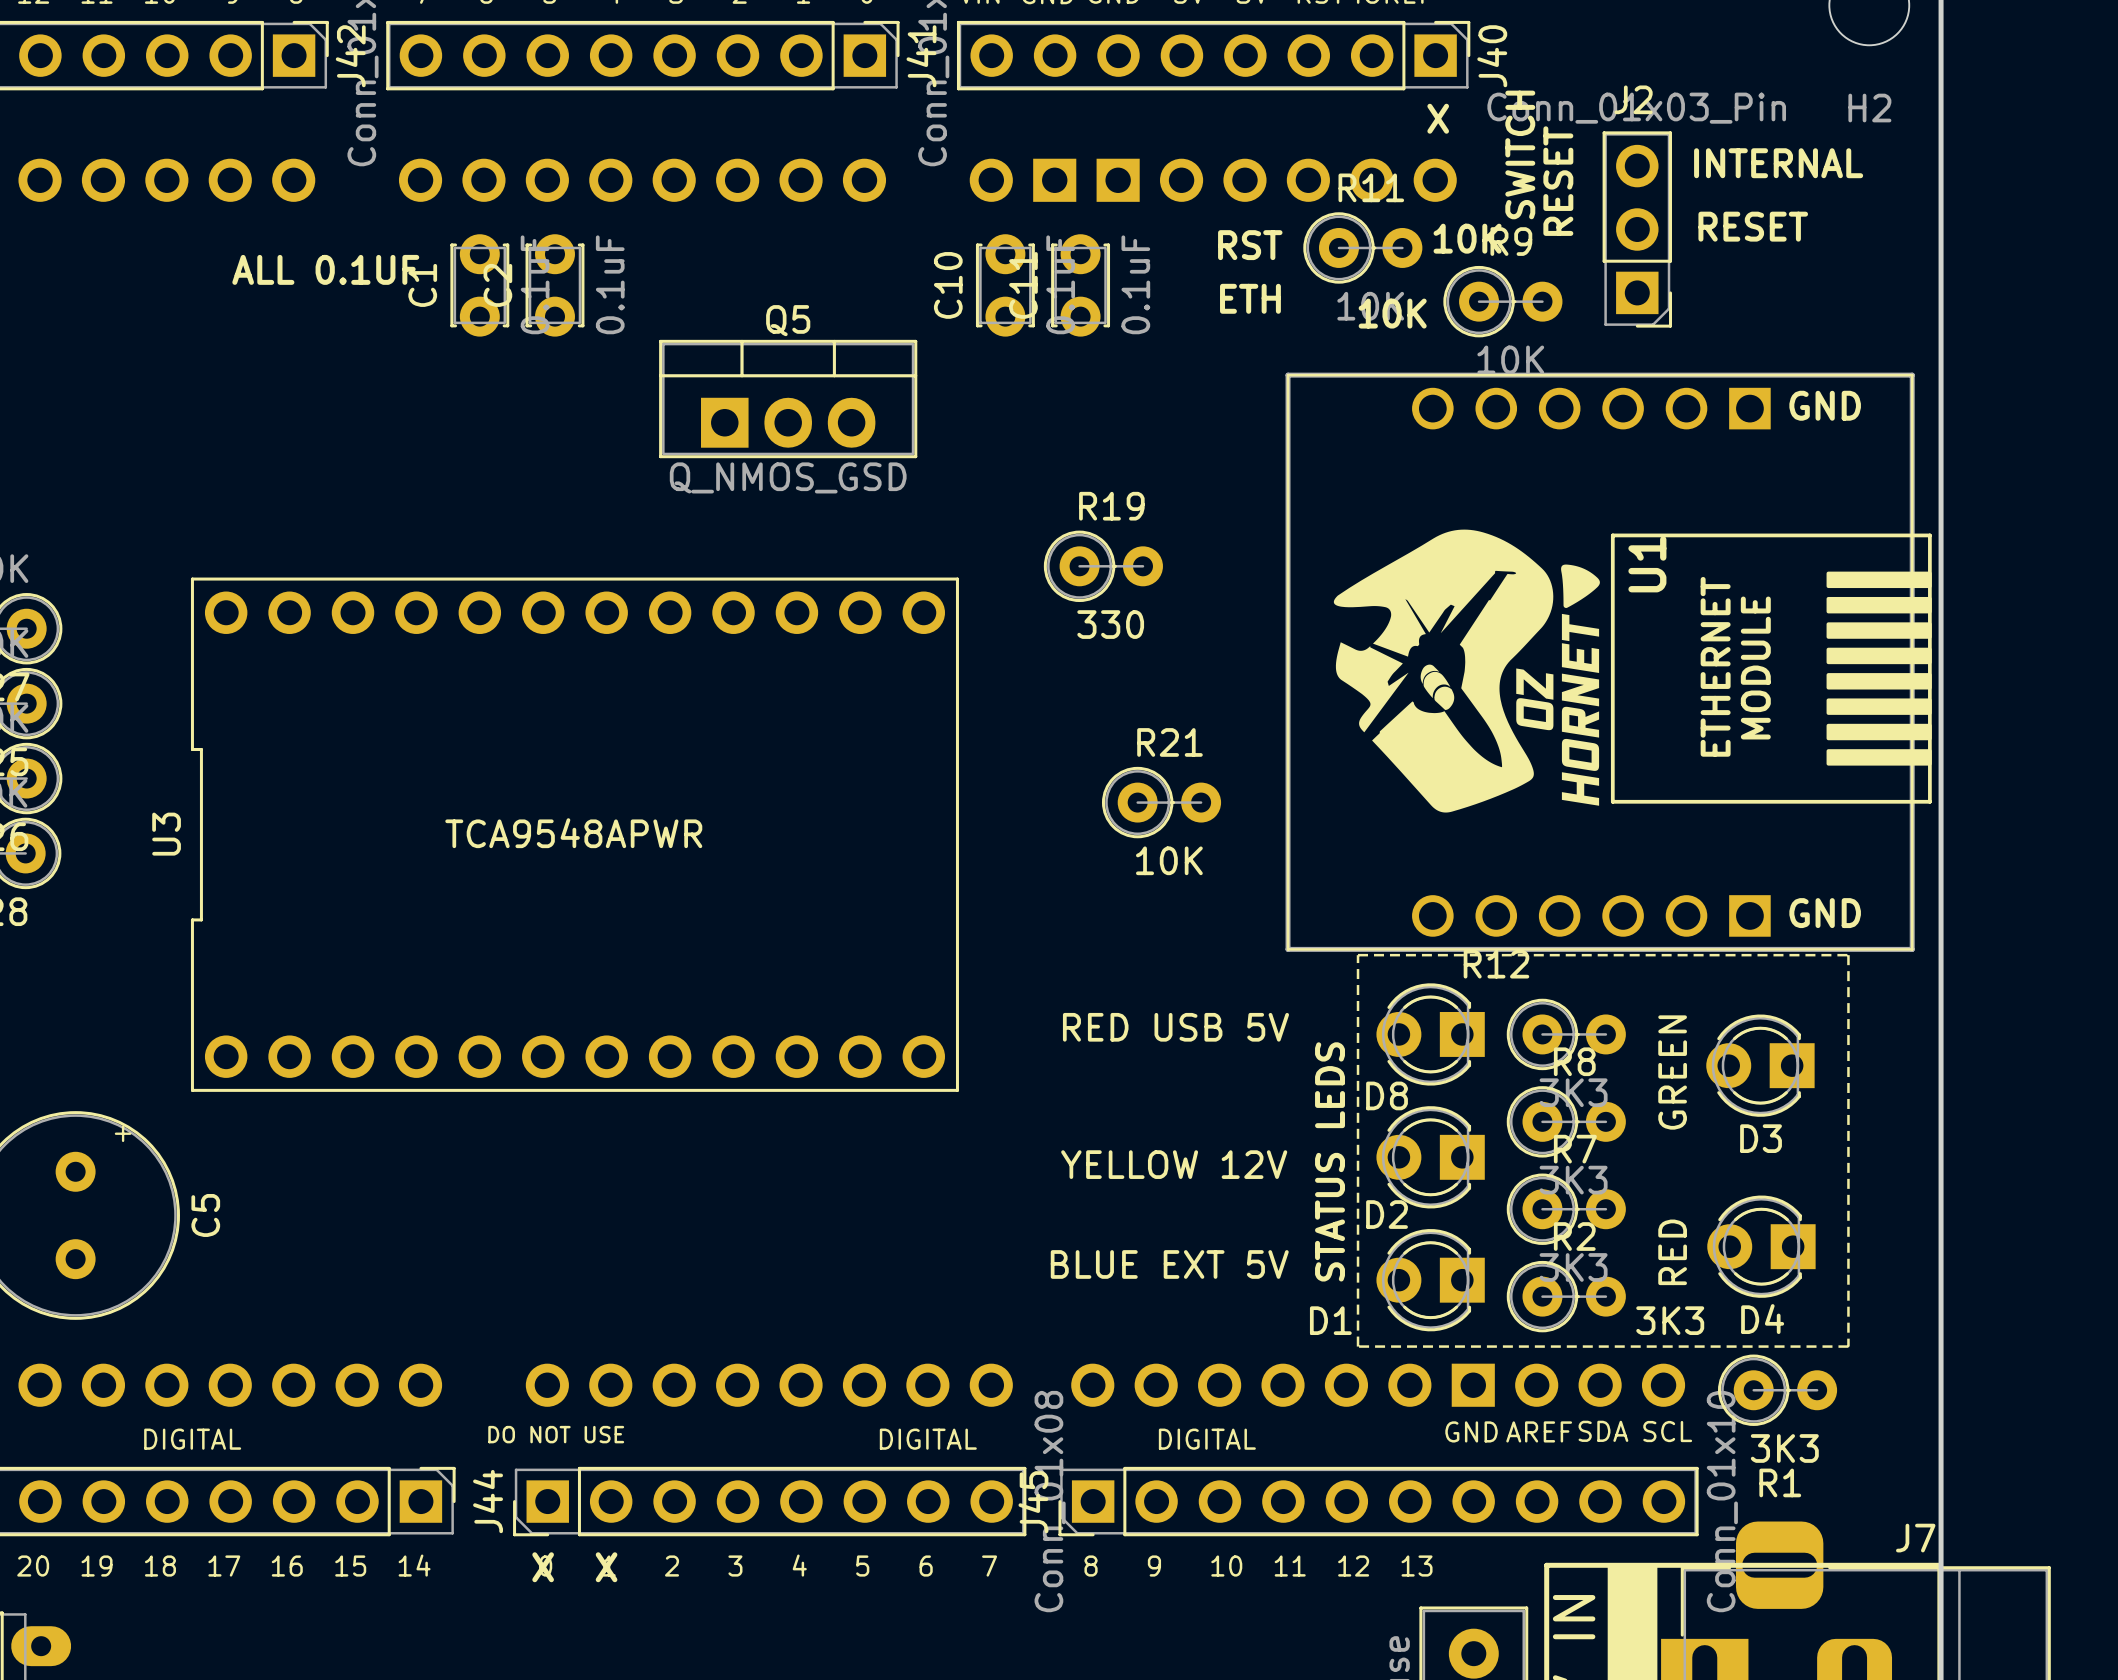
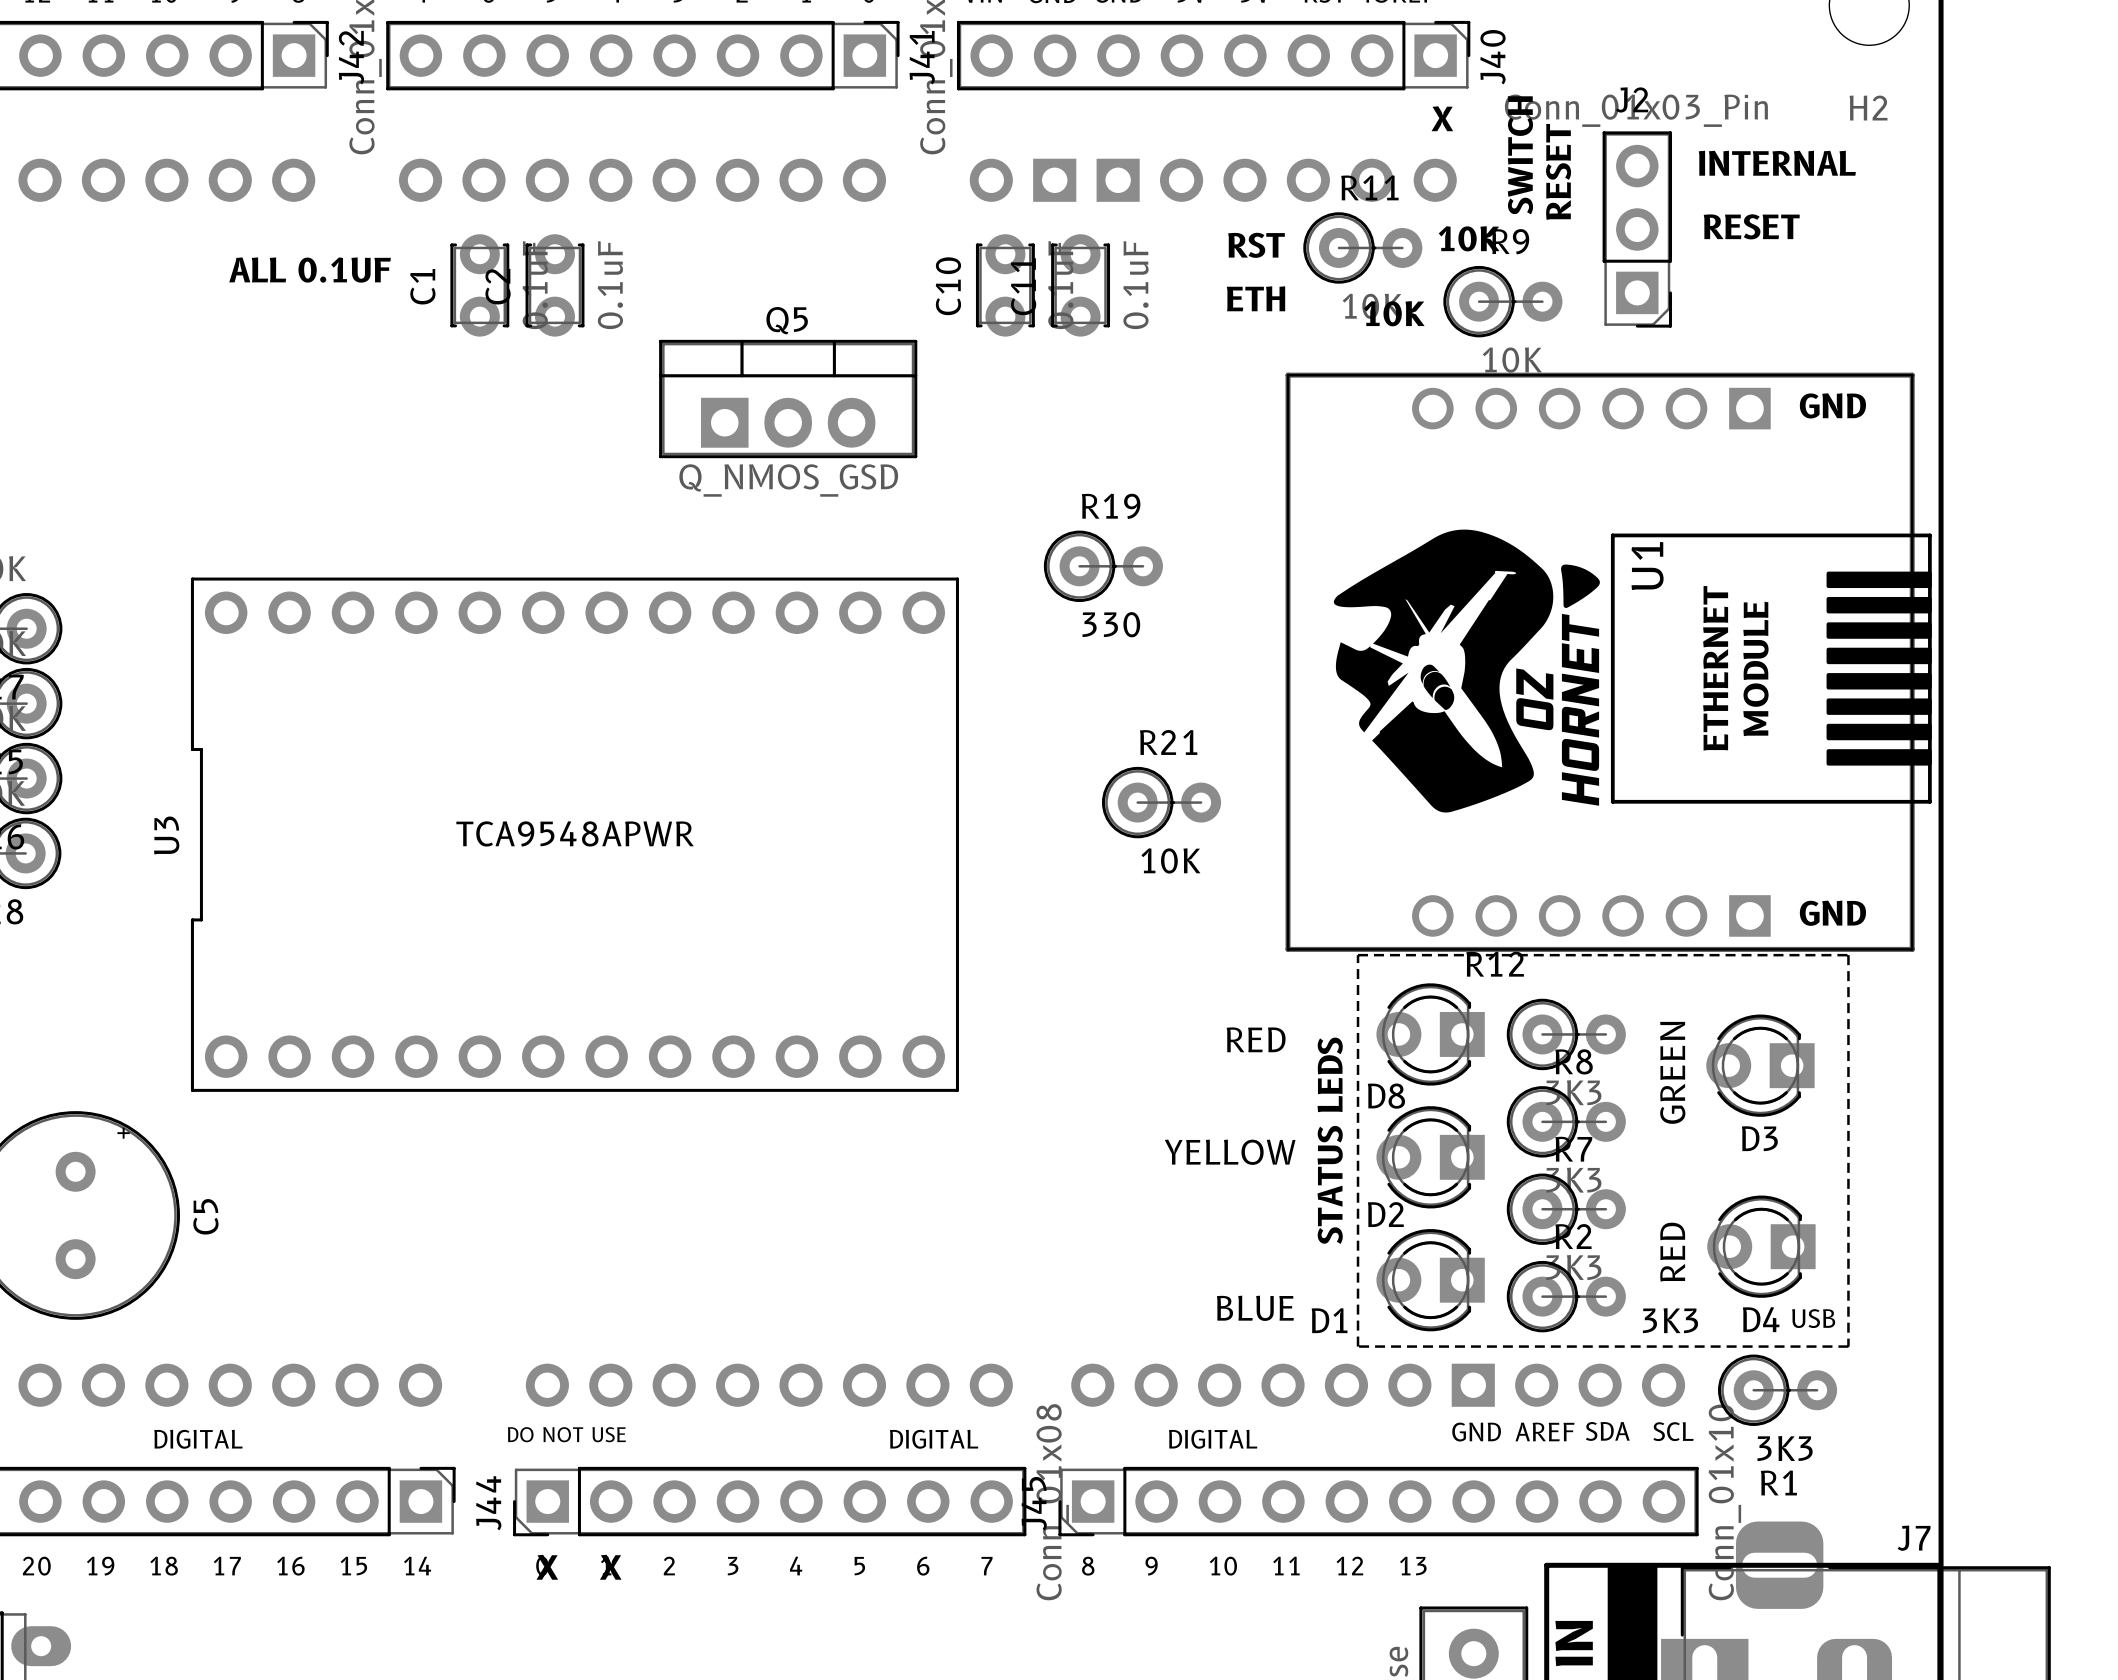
D8 value: RED USB 5V (1175, 1027) -> RED (1256, 1039)
D2 value: YELLOW 12V (1174, 1164) -> YELLOW (1230, 1152)
D1 value: BLUE EXT 5V (1169, 1264) -> BLUE (1255, 1308)
text: none -> USB (1813, 1318)

